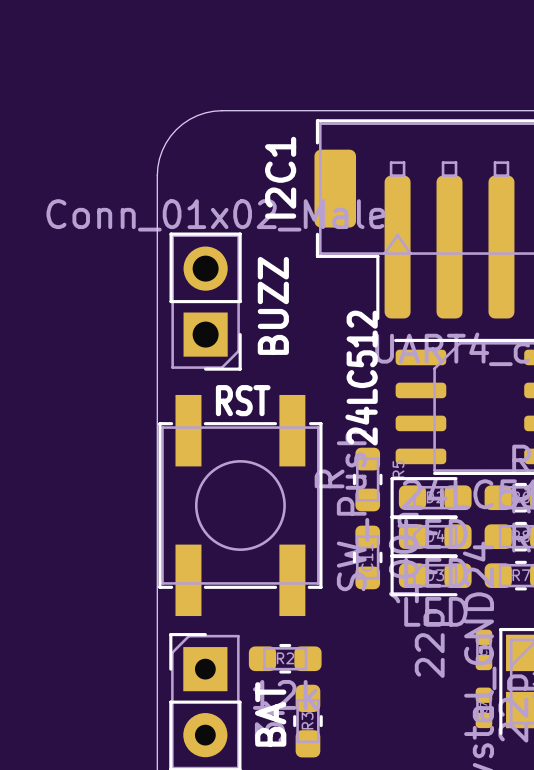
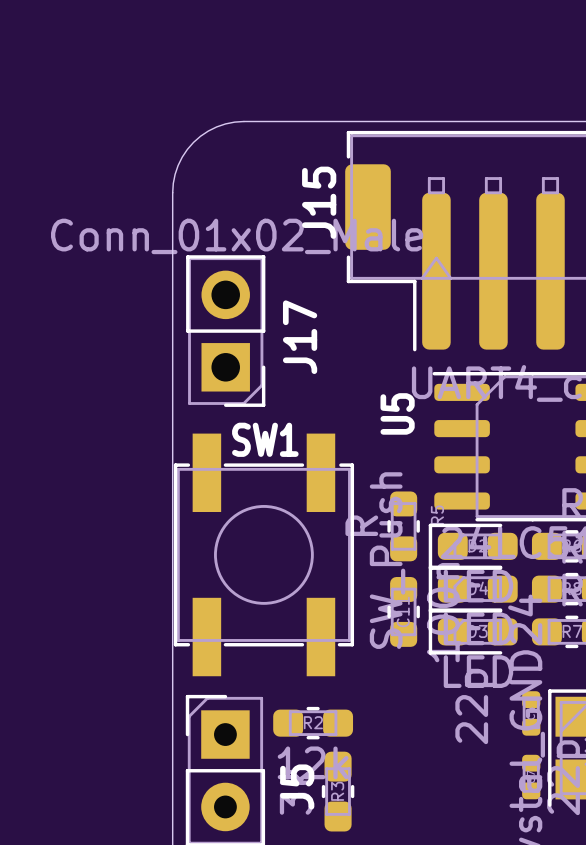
I2C1 name: I2C1 (280, 177) -> J15 (319, 202)
BUZZ name: BUZZ (273, 305) -> J17 (300, 337)
24LC512 name: 24LC512 (361, 378) -> U5 (397, 413)
RST name: RST (243, 400) -> SW1 (265, 439)
BAT name: BAT (270, 714) -> J5 (297, 786)

